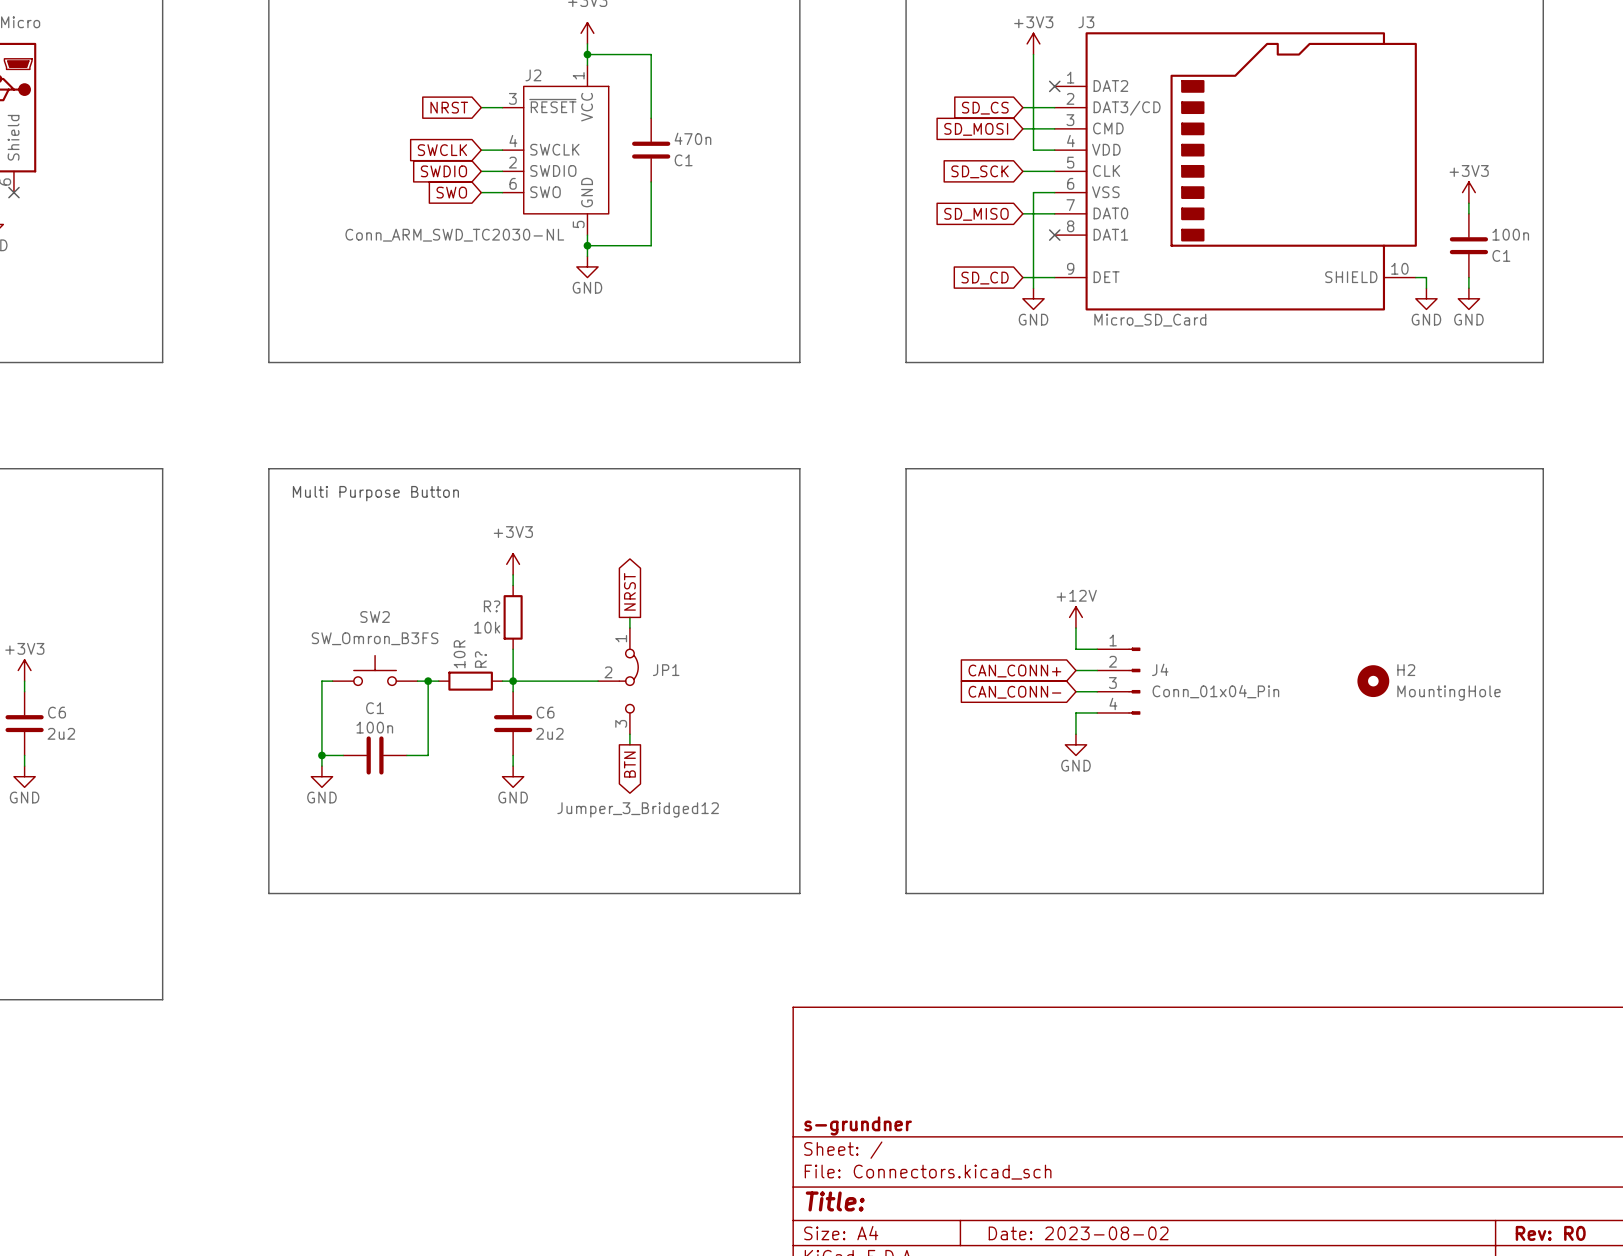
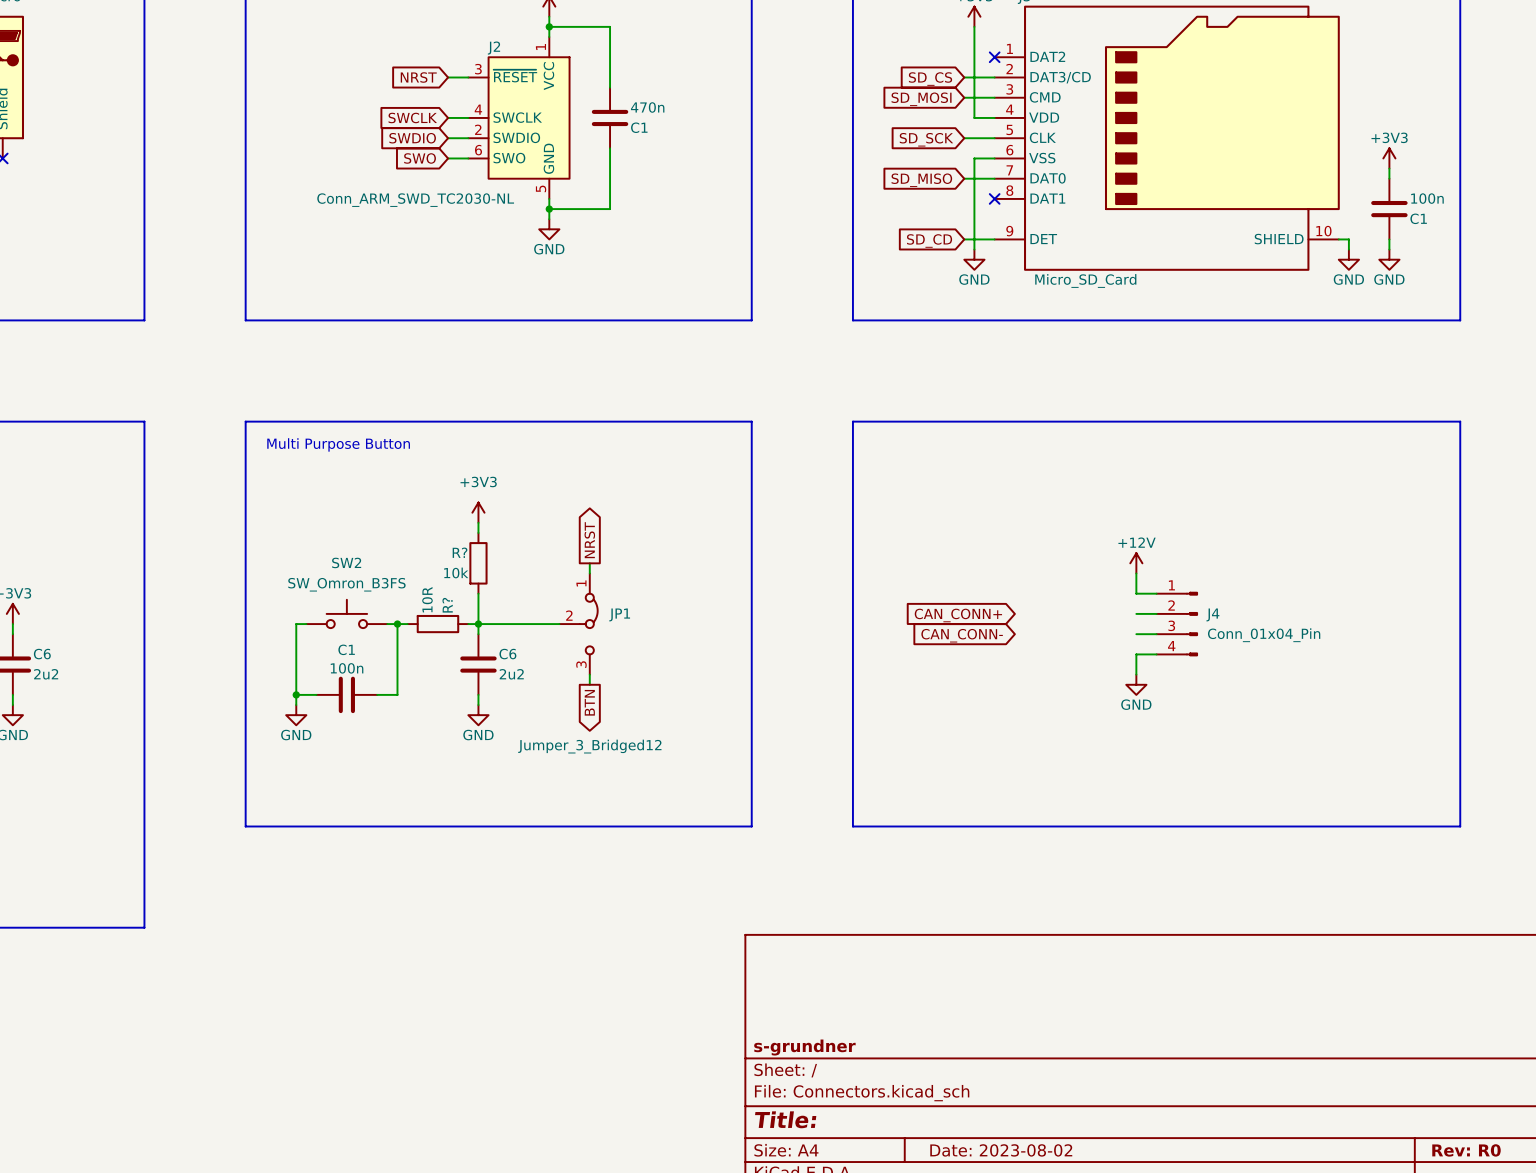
power symbol position: +12V (1075, 617) -> +12V (1136, 563)
wire: (1075, 628) (1075, 649) (1097, 649) -> (1136, 573) (1136, 593) (1156, 593)
wire: (1075, 670) (1097, 670) -> (1136, 613) (1156, 613)
J4 position: (1118, 681) -> (1177, 624)
H2: MountingHole (1373, 681) -> none
wire: (1075, 691) (1097, 691) -> (1136, 634) (1156, 634)
wire: (1097, 712) (1075, 712) (1075, 734) -> (1156, 654) (1136, 654) (1136, 674)
power symbol position: GND (1075, 744) -> GND (1136, 684)

